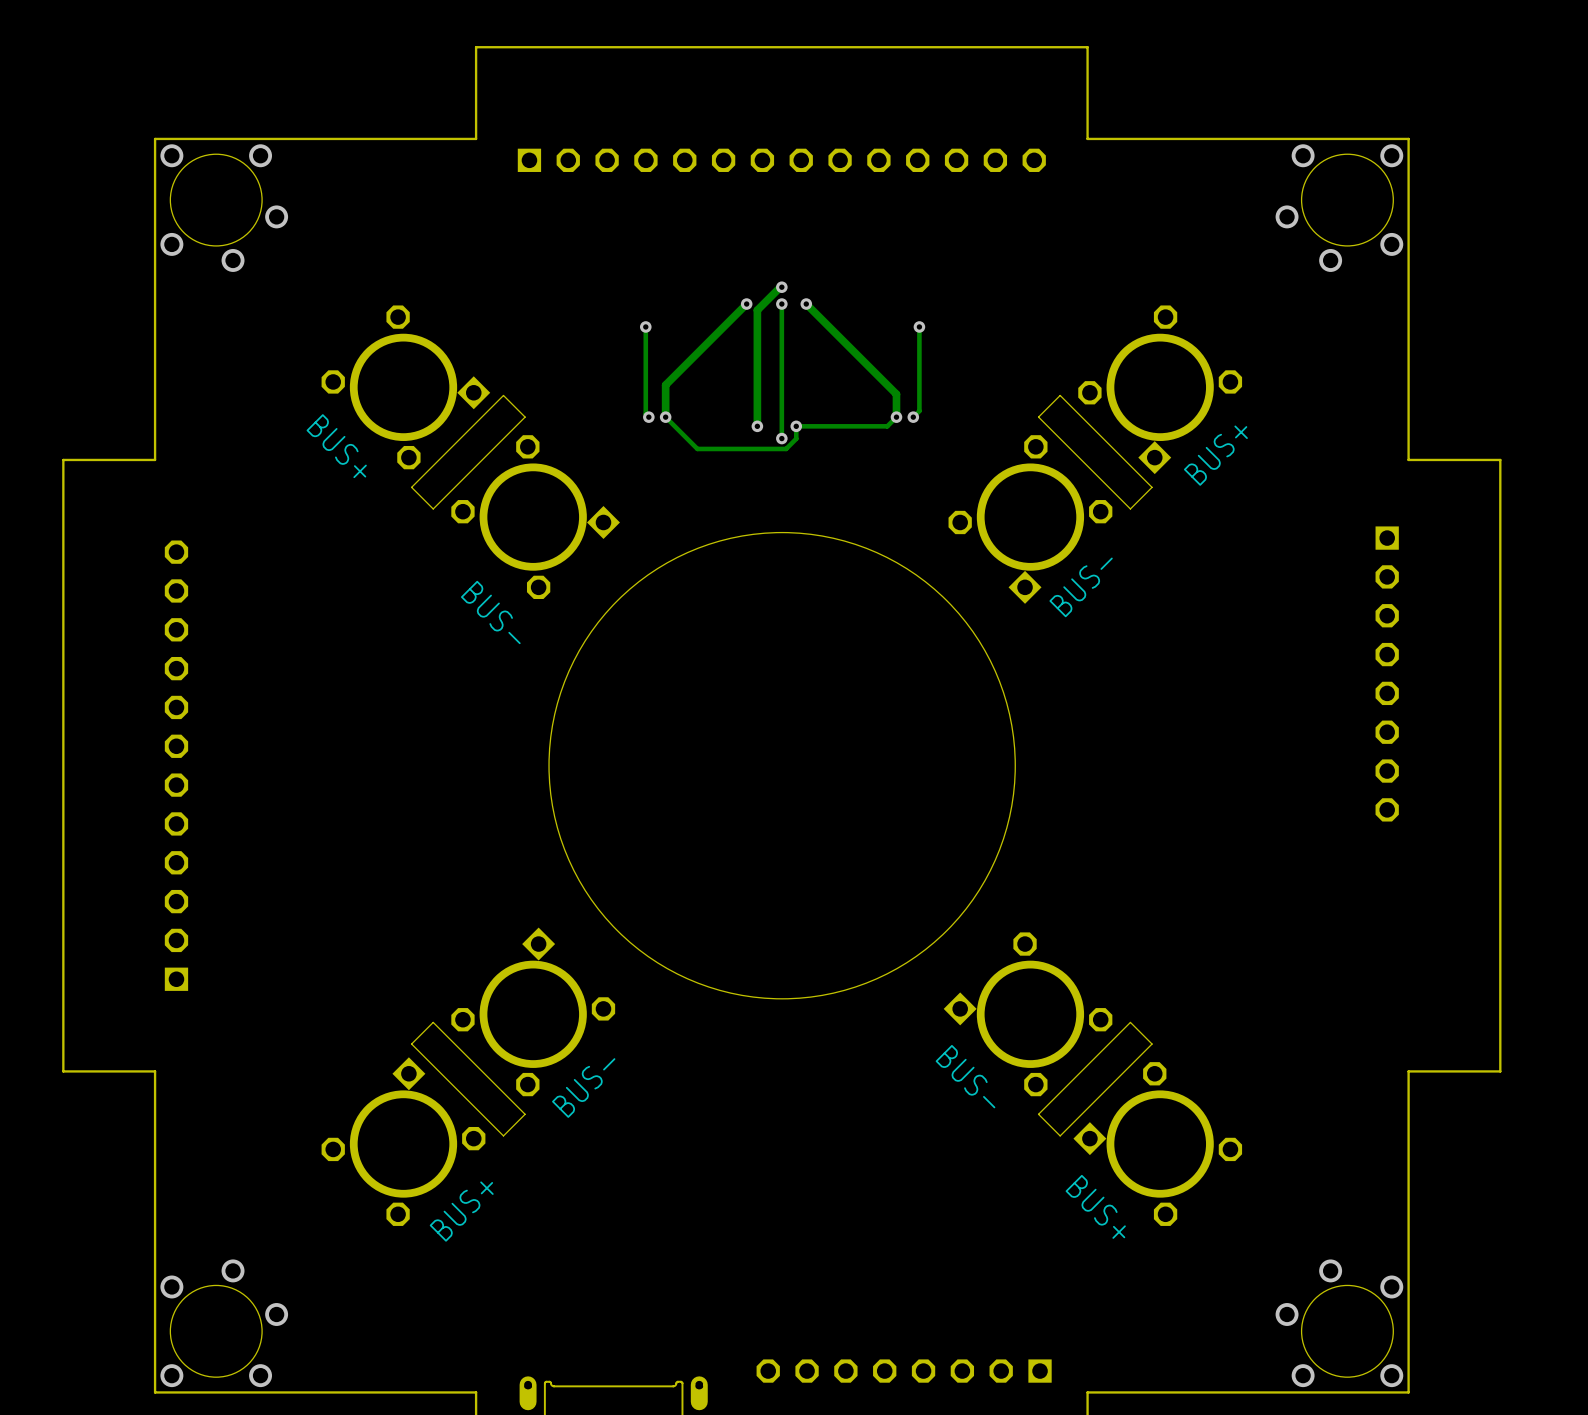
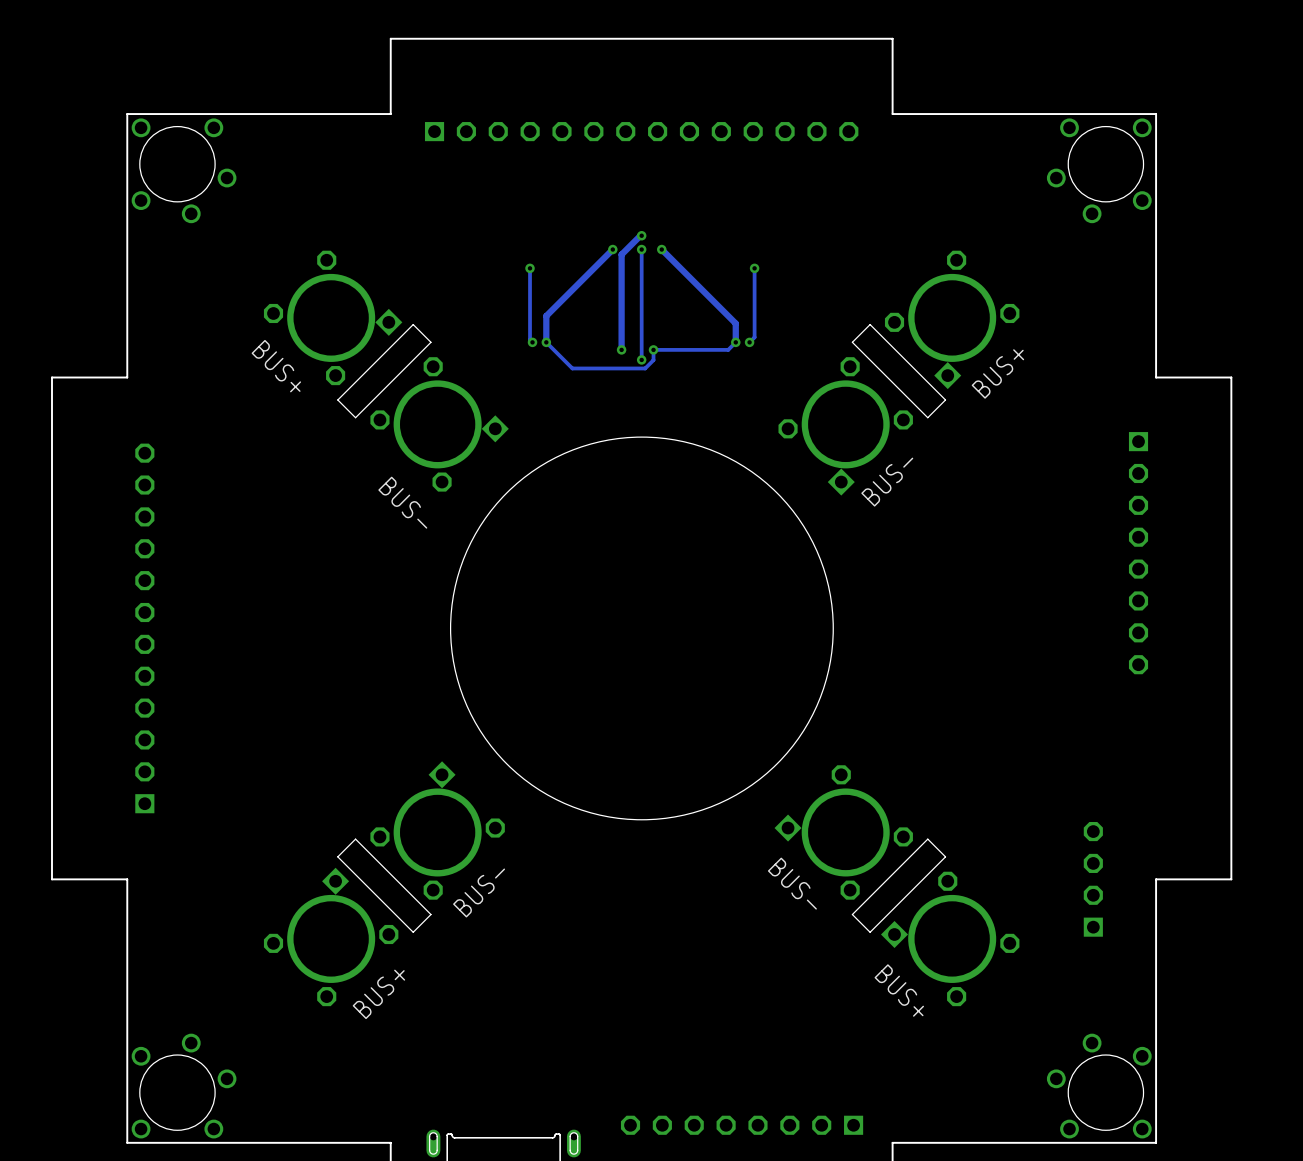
part: none -> (1093, 879)

